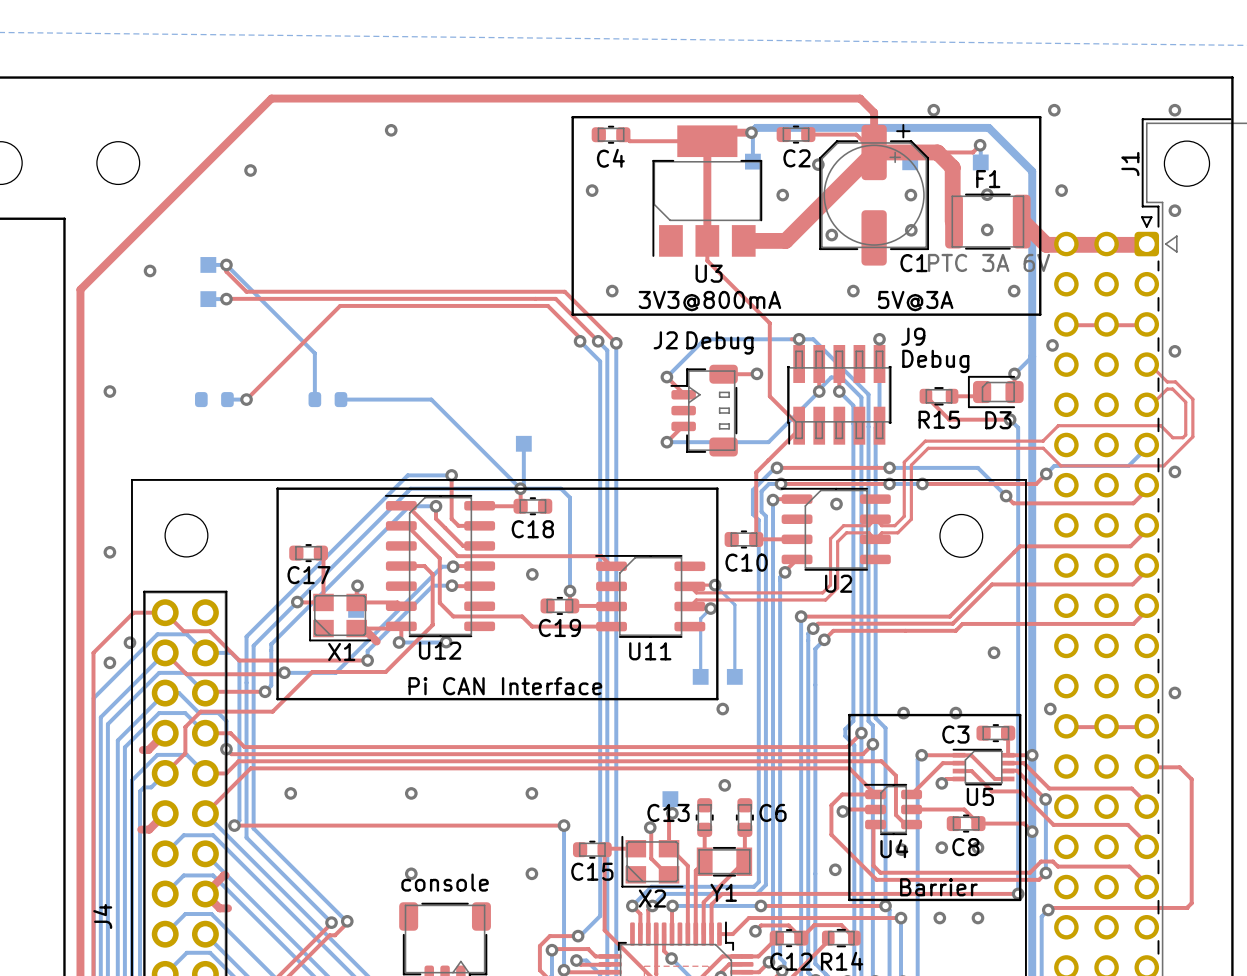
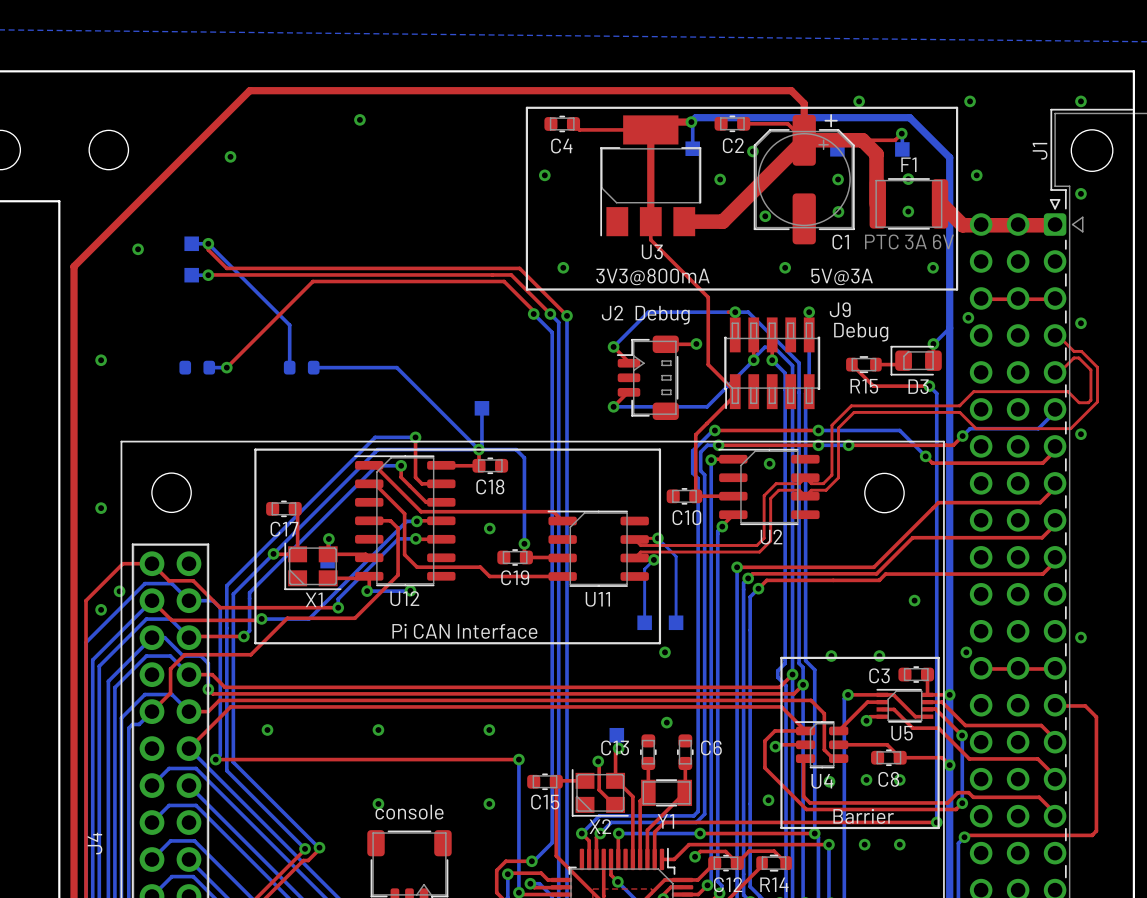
top track: (356, 628) (363, 628) (376, 641) -> none
top track: (165, 733) (148, 750) (142, 750) -> none
top track: (165, 813) (149, 829) (141, 829) -> none
top track: (225, 875) (205, 894) (219, 908) (228, 908) -> none

